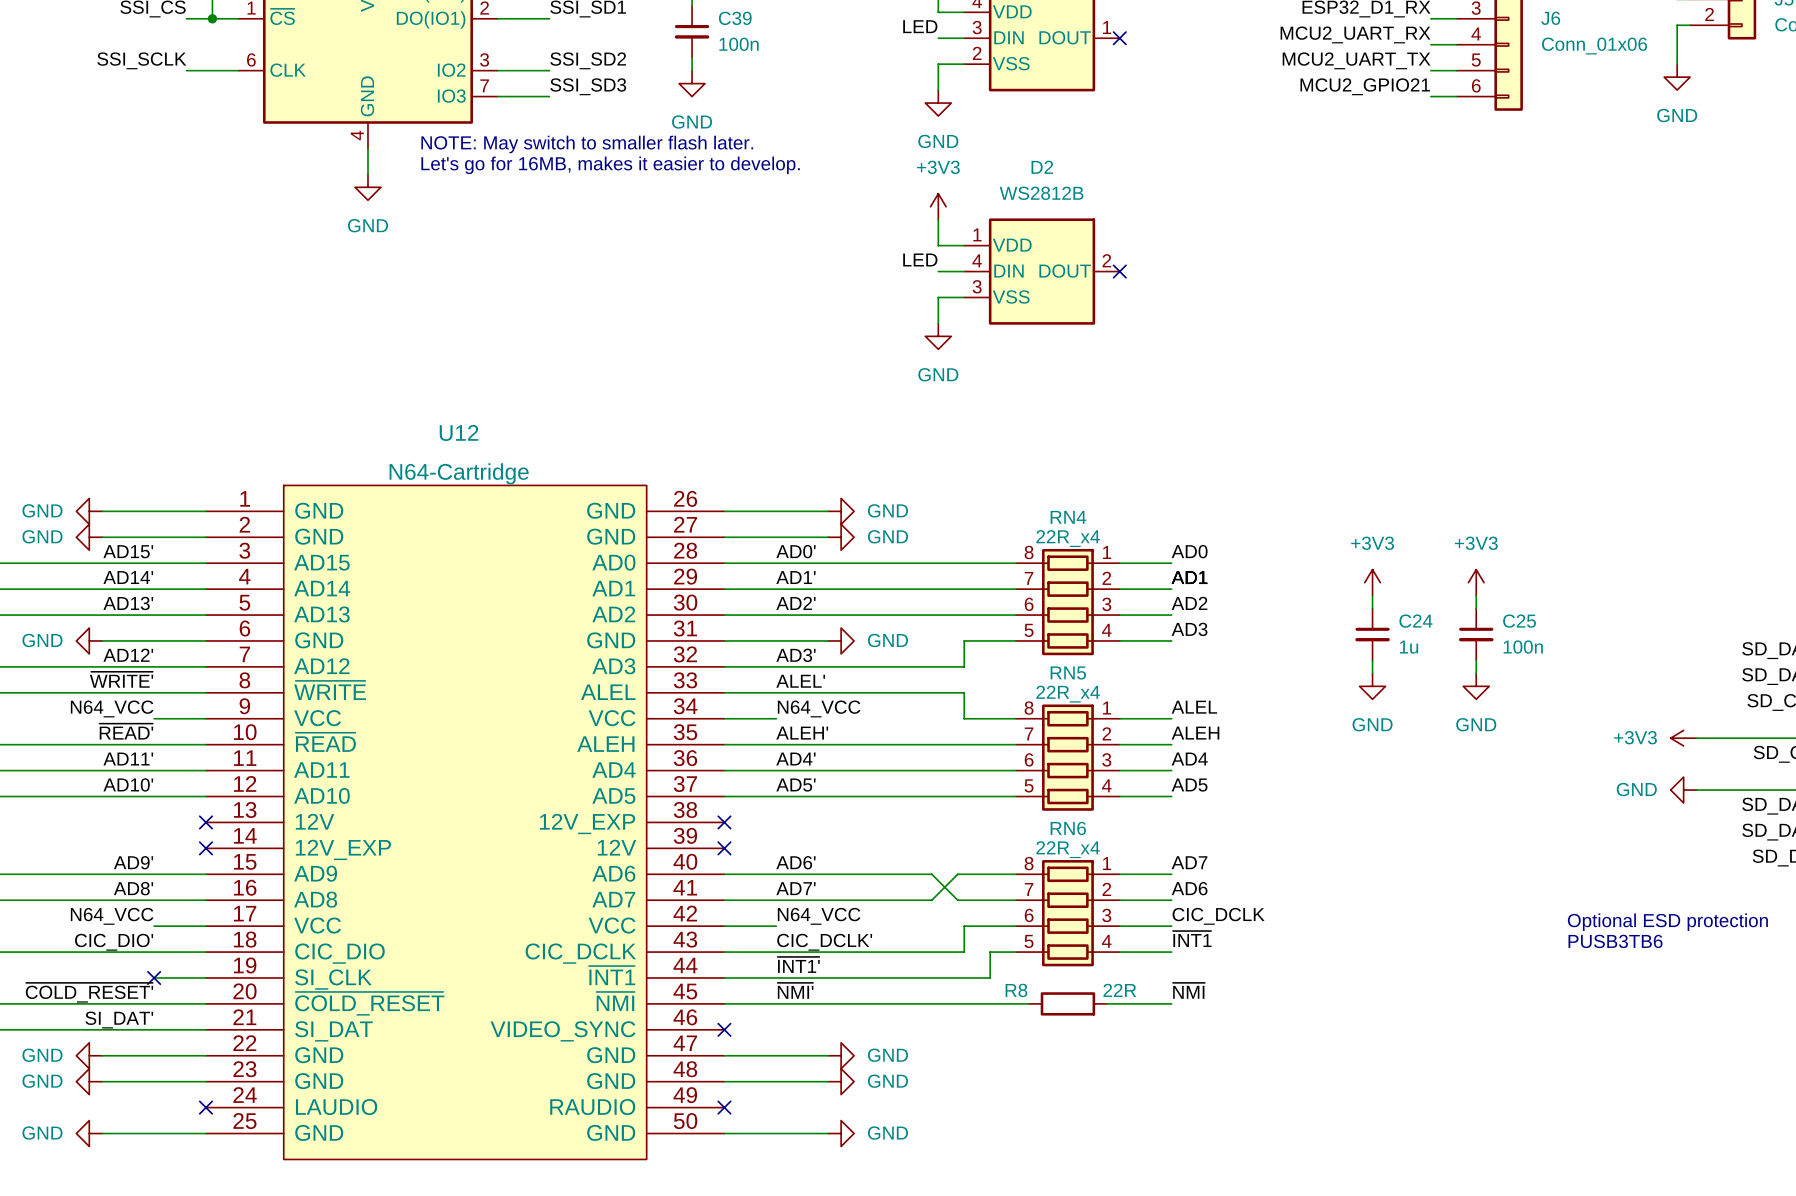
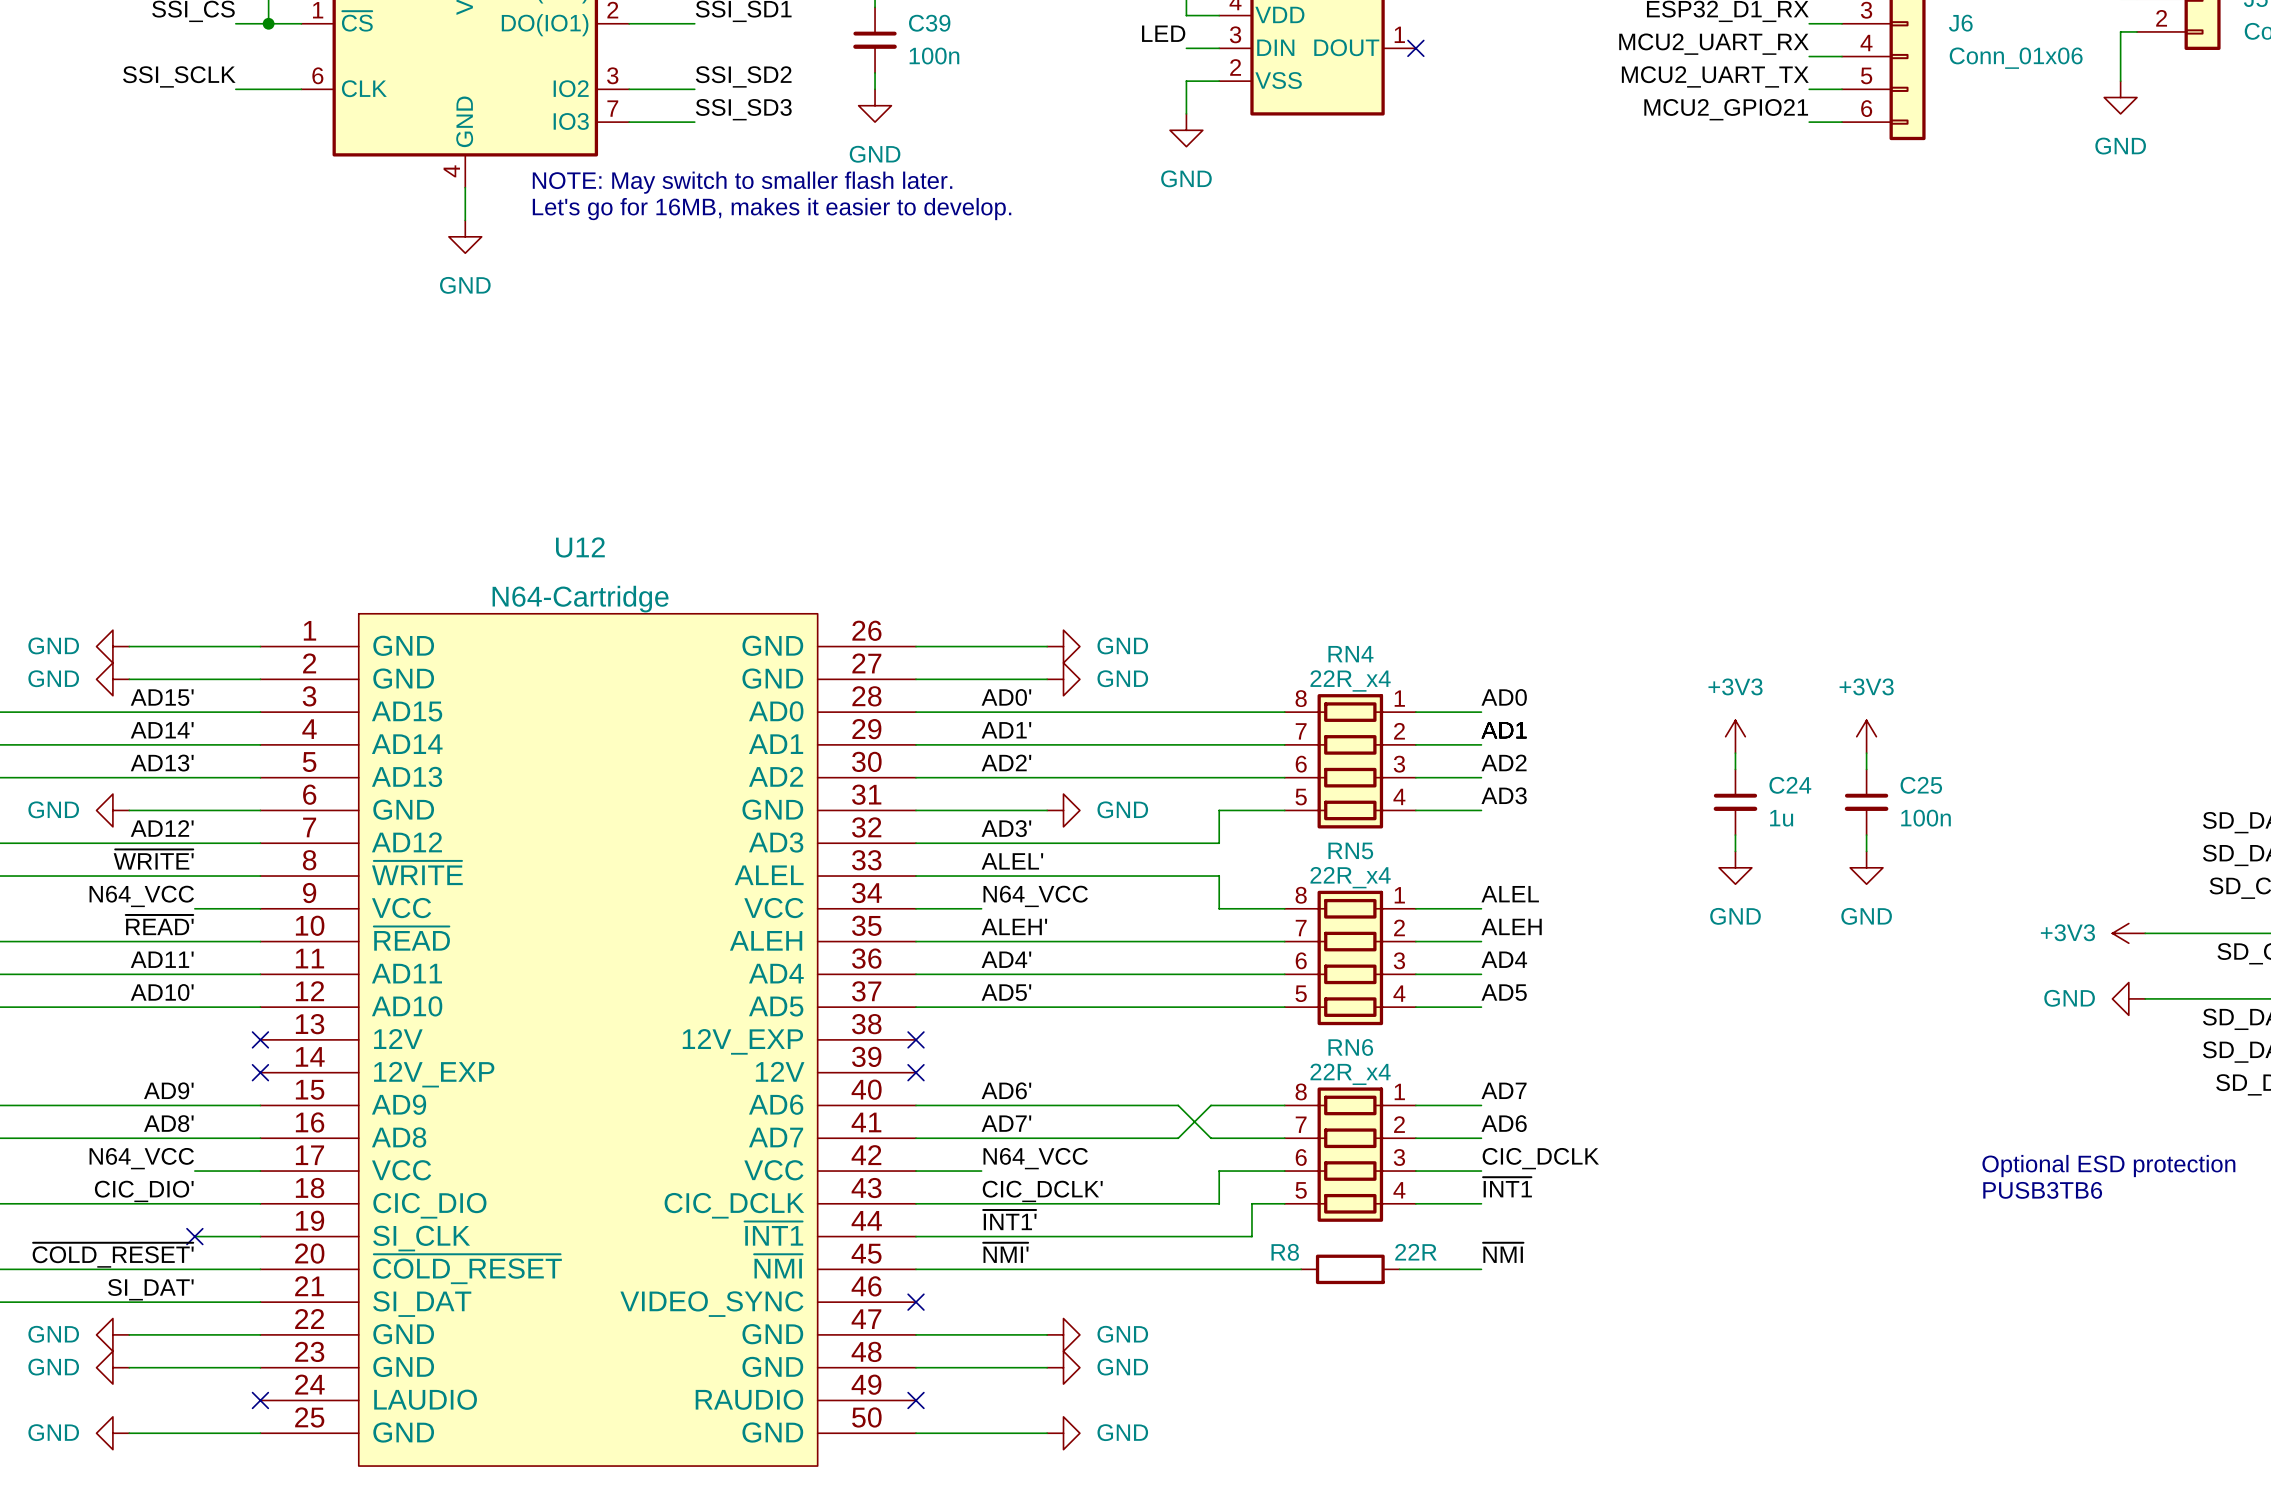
power symbol: +3V3 (938, 206) -> none
wire: (938, 219) (938, 245) (964, 245) -> none
label: LED (920, 259) -> none
wire: (938, 271) (964, 271) -> none
D2: WS2812B (1042, 271) -> none
no-connect mark: (1119, 271) -> none
wire: (964, 297) (938, 297) (938, 323) -> none
power symbol: GND (938, 336) -> none

